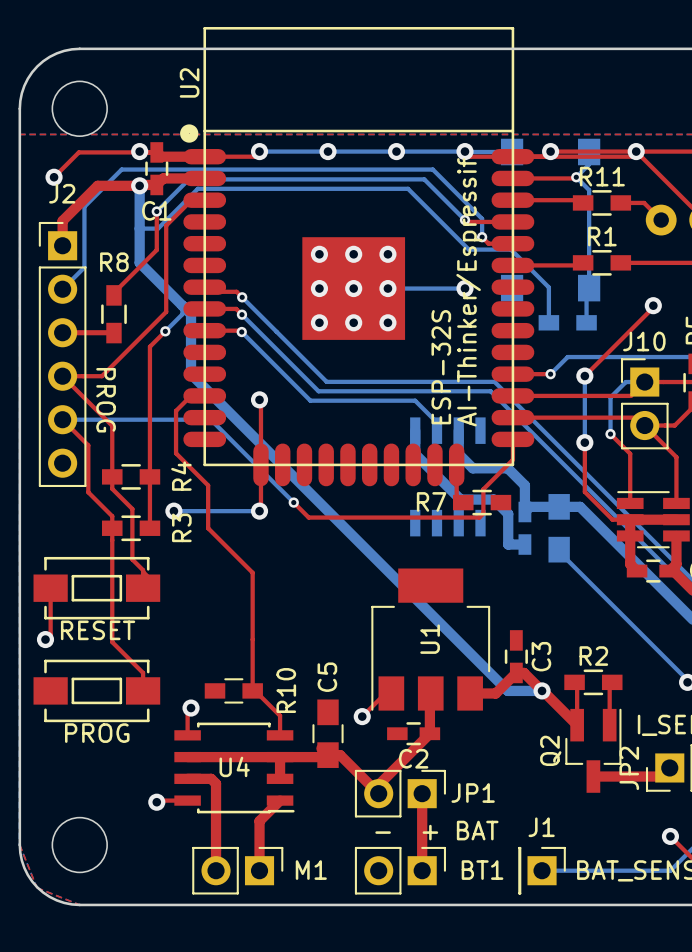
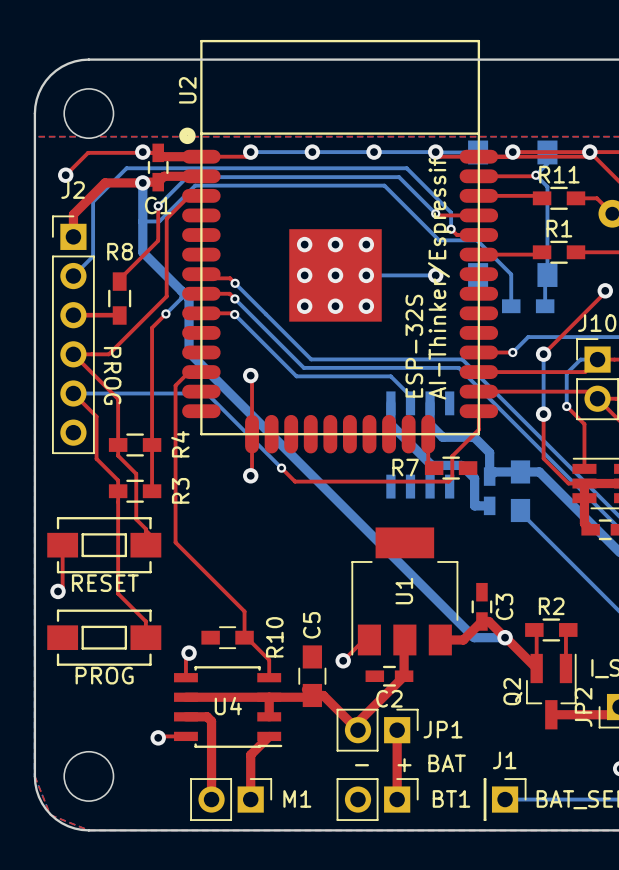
top track: (176, 453) (208, 485) (208, 528) (252, 572) (252, 661) -> (175, 423) (175, 542) (244, 611)
bottom track: (173, 511) (259, 511) -> none
via: (173, 511) -> none

